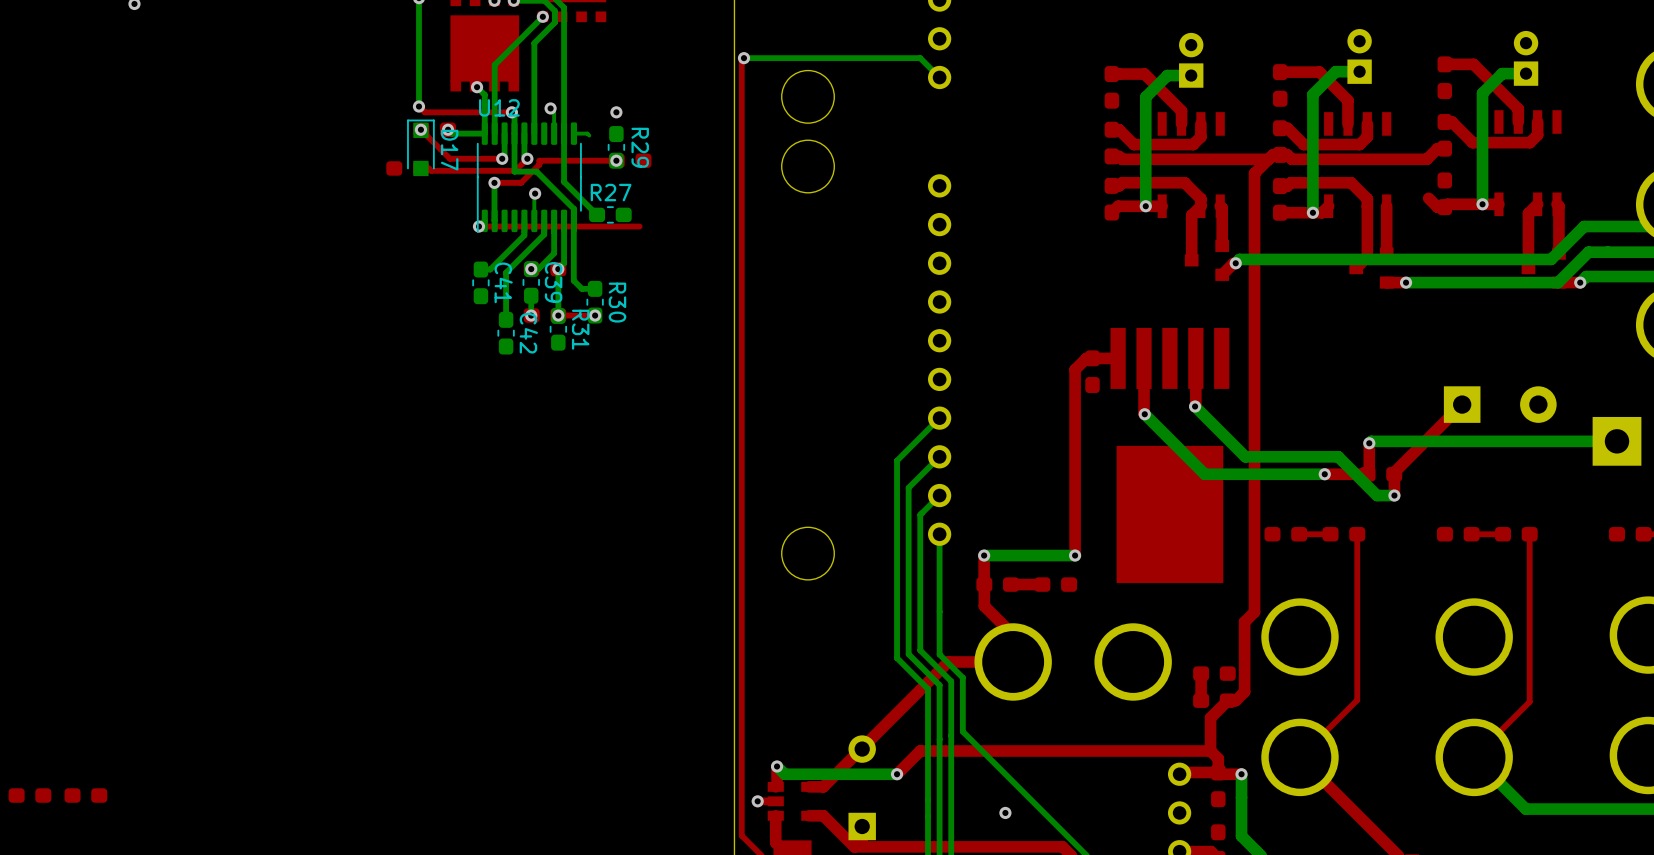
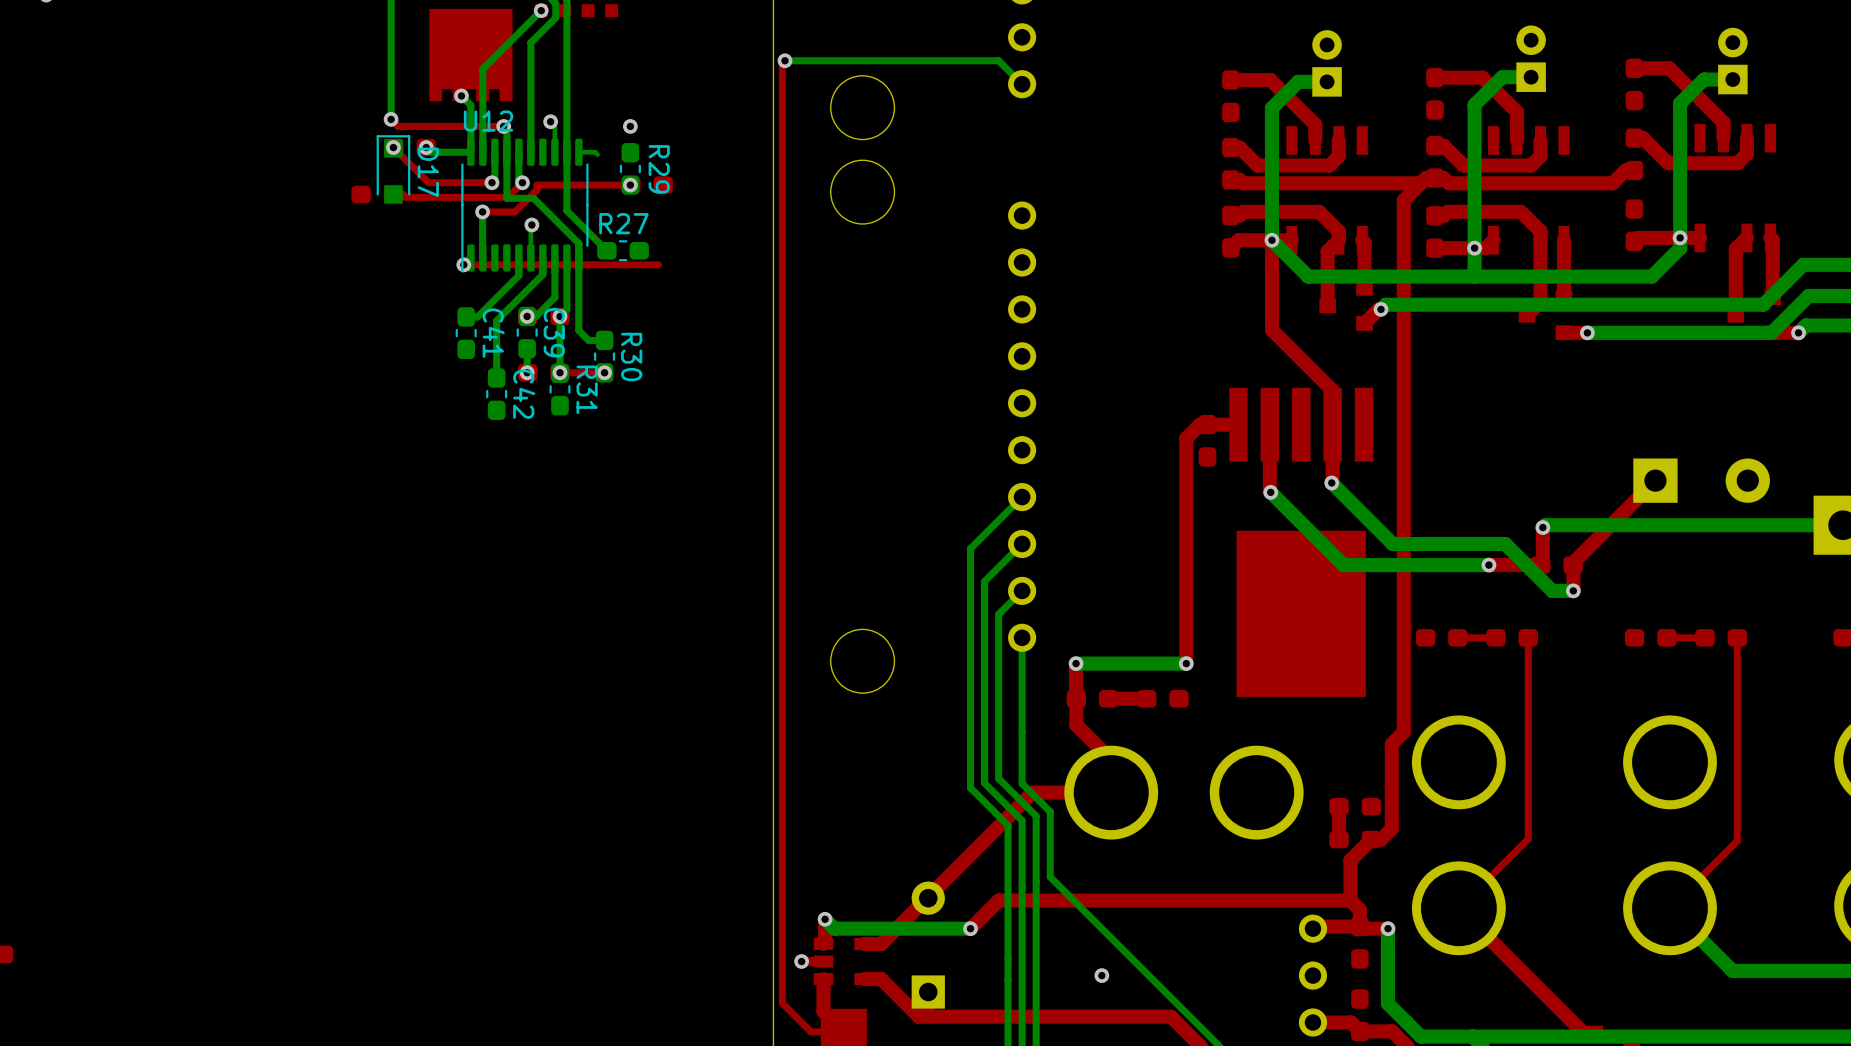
top track: (1428, 198) (1437, 207) (1444, 207) -> none
bottom track: none -> (1680, 237) (1680, 248) (1651, 276) (1308, 276) (1271, 240)
top track: none -> (1271, 240) (1271, 329) (1332, 390) (1332, 424)
bottom track: none -> (1474, 248) (1474, 276)

